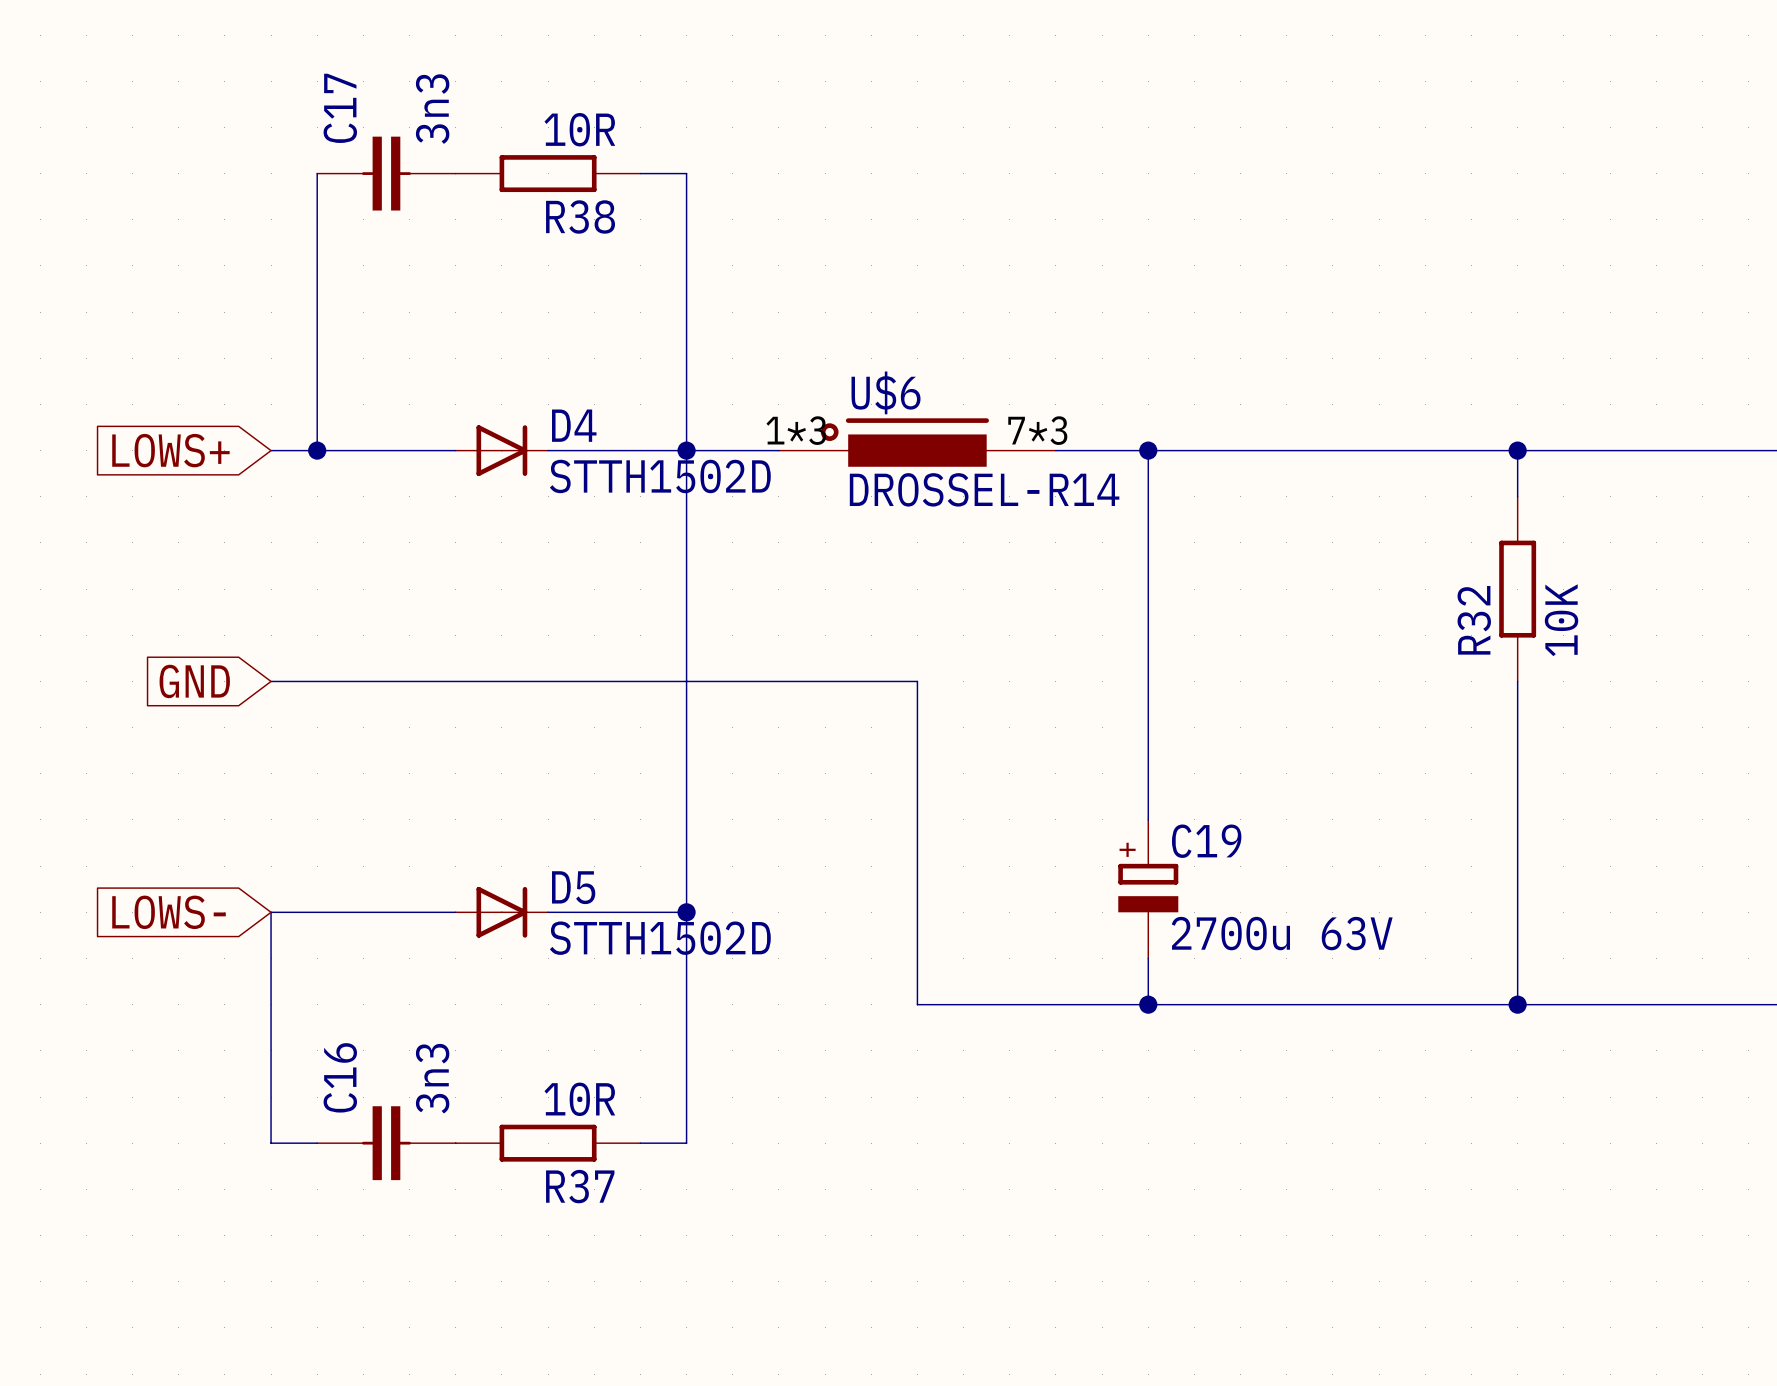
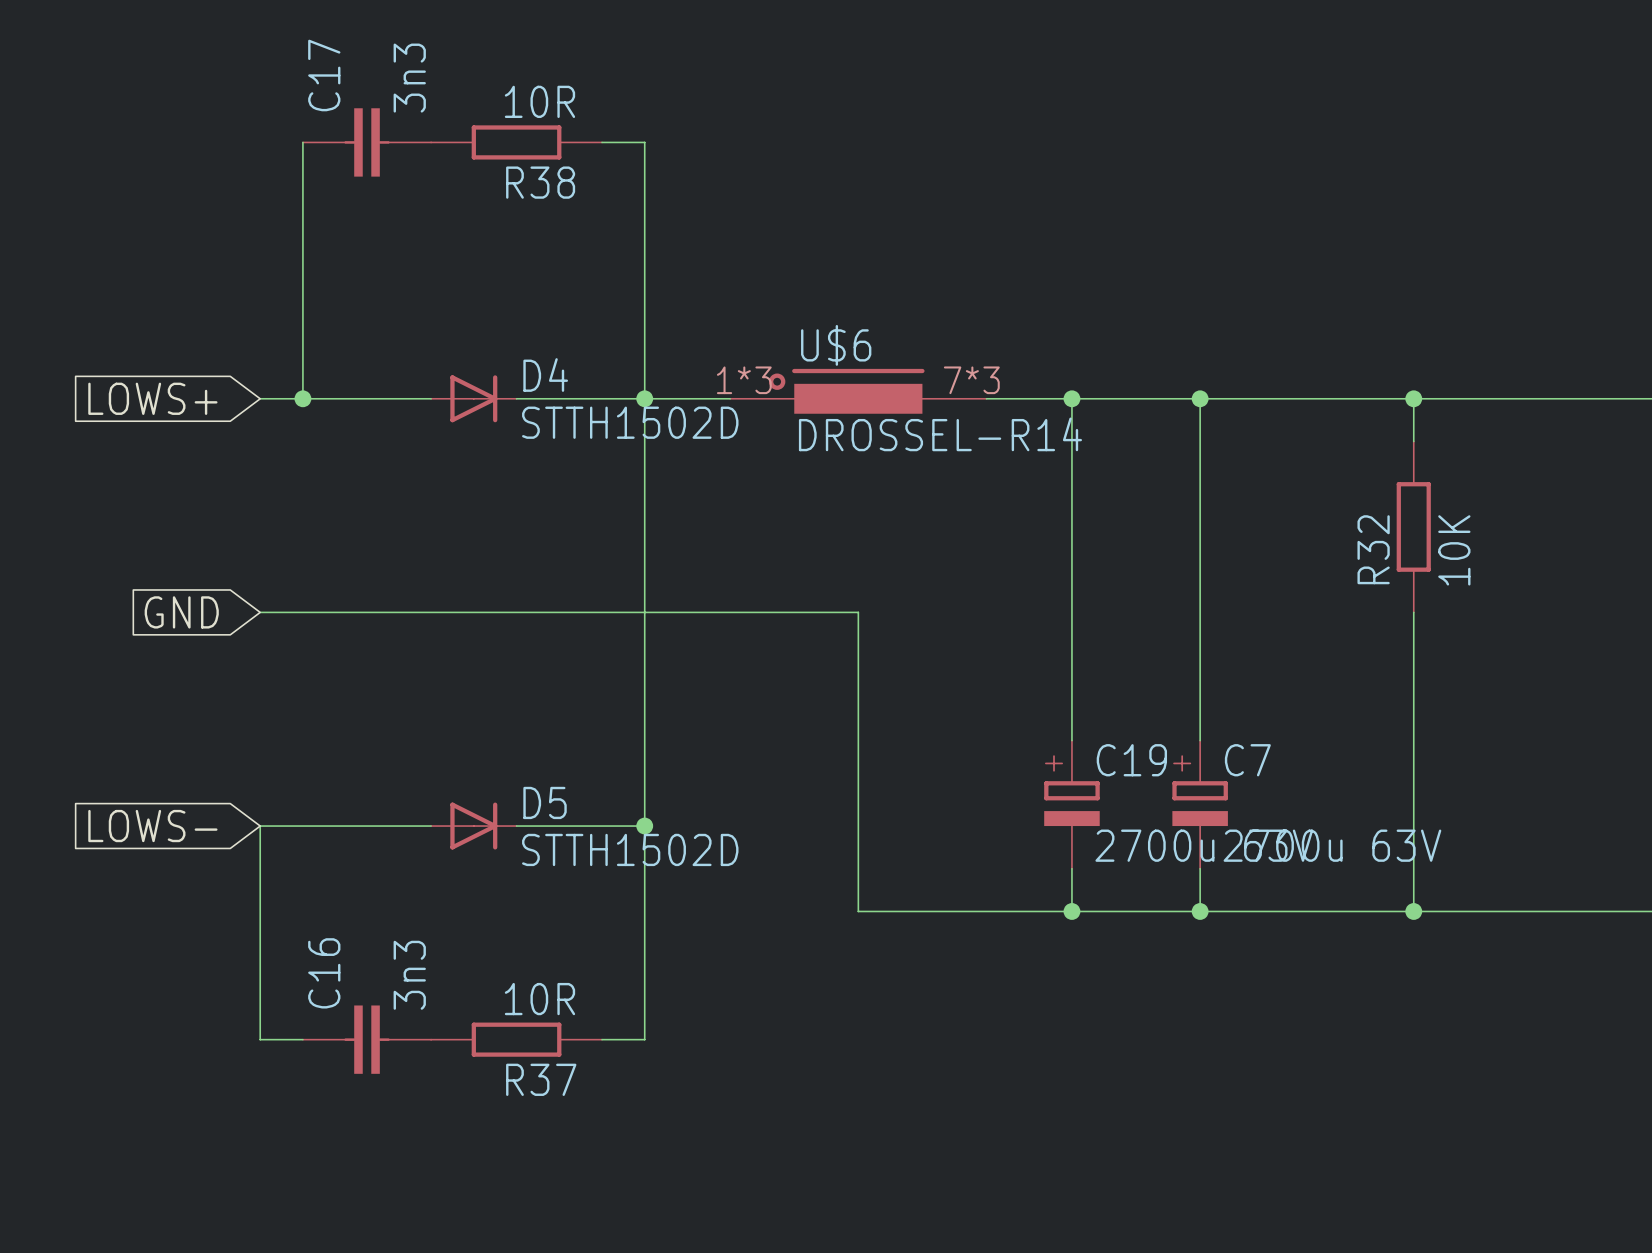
wire: none -> (1200, 398) (1200, 740)
junction: none -> (1200, 398)
C7: none -> 2700u 63V (1200, 804)
wire: none -> (1200, 868) (1200, 911)
junction: none -> (1200, 911)

